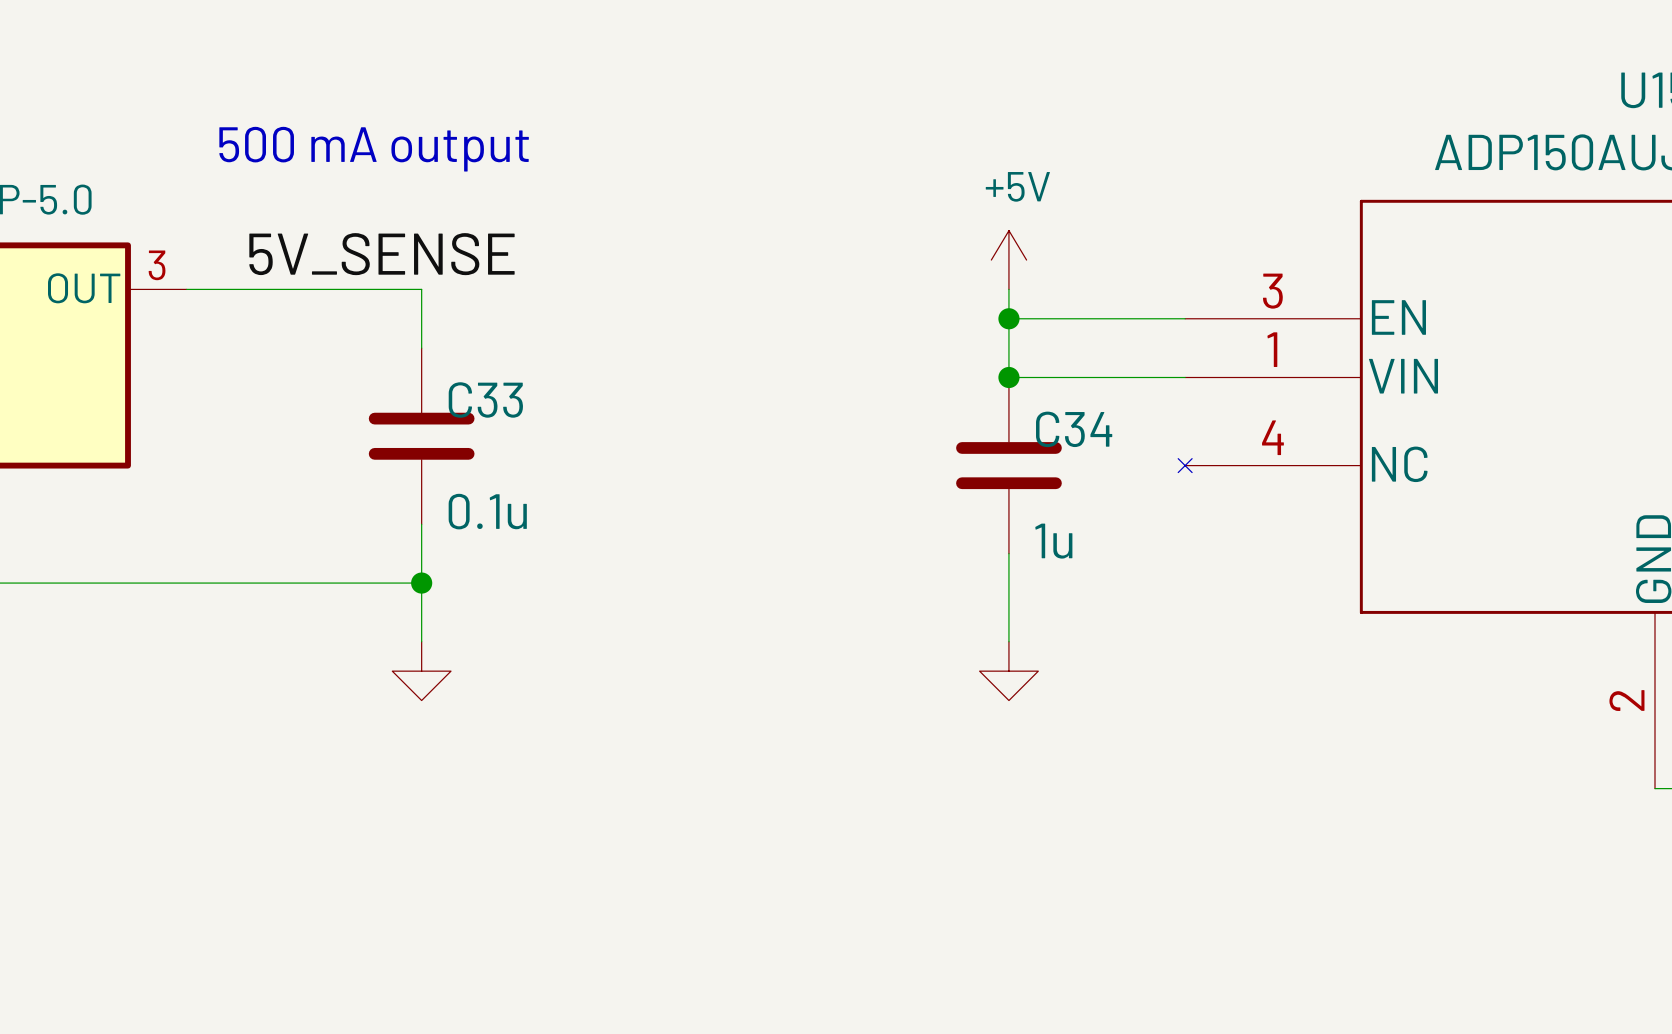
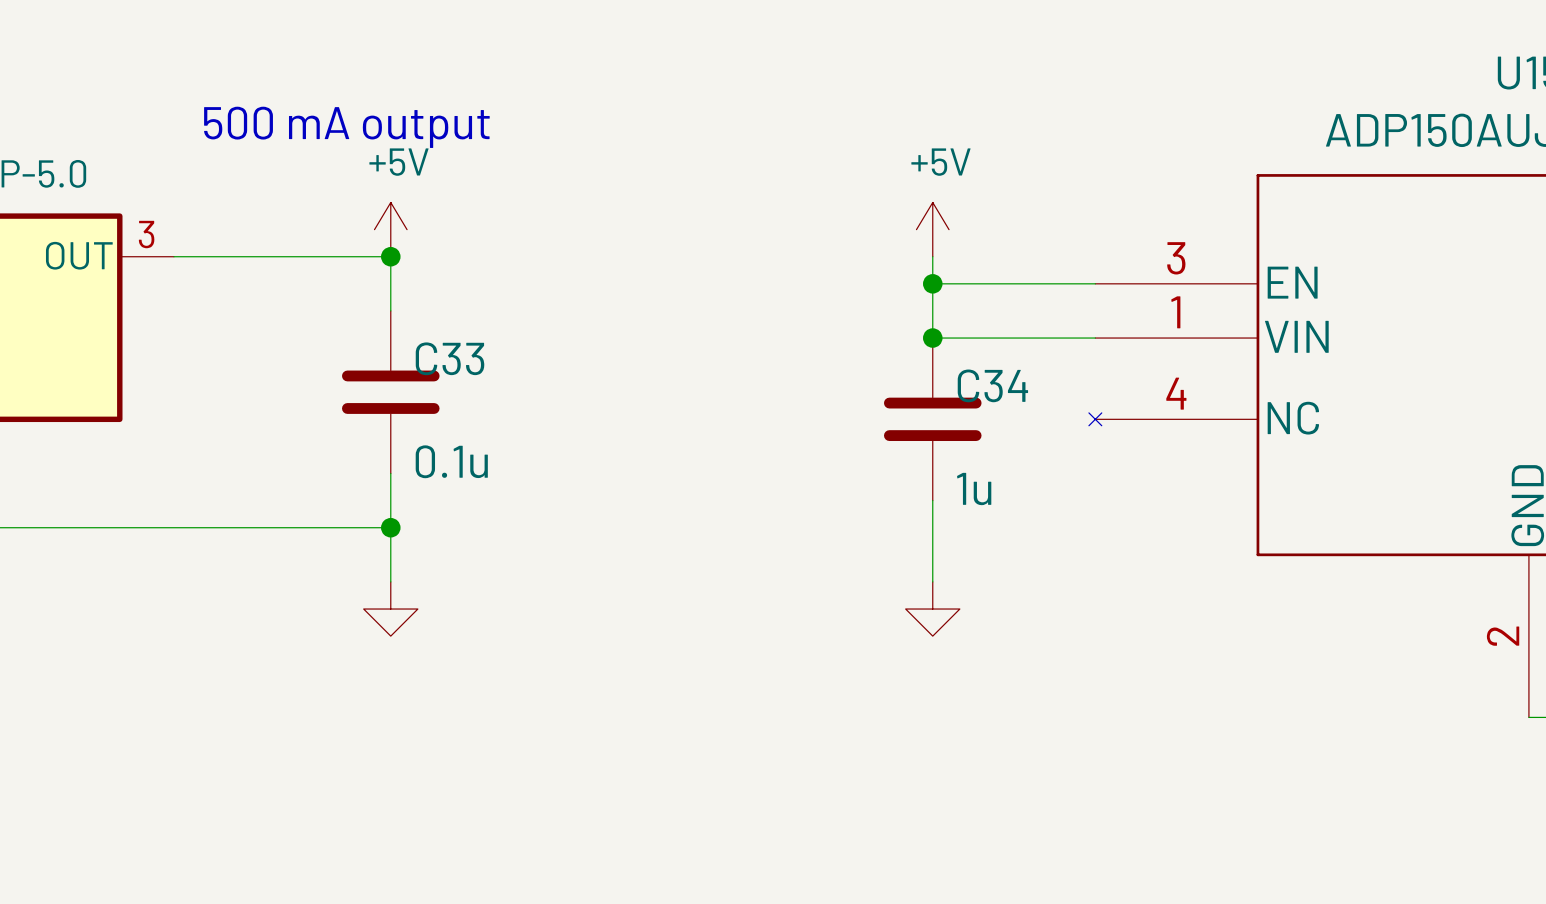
label: 5V_SENSE (381, 254) -> none
power symbol: none -> +5V (390, 229)
junction: none -> (390, 256)

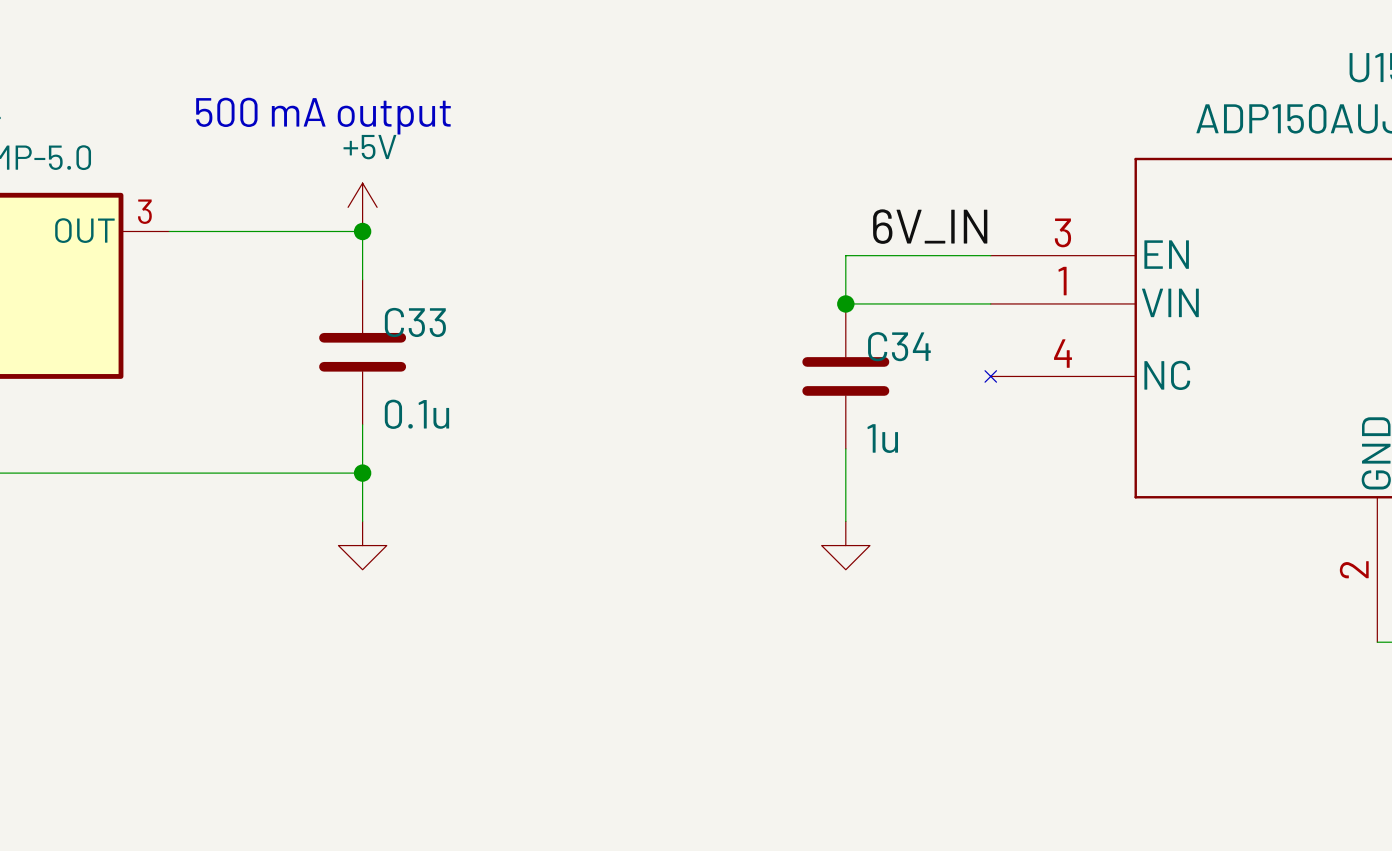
power symbol: +5V (932, 229) -> none
label: none -> 6V_IN (930, 226)
wire: (932, 256) (932, 283) -> none
junction: (932, 283) -> none

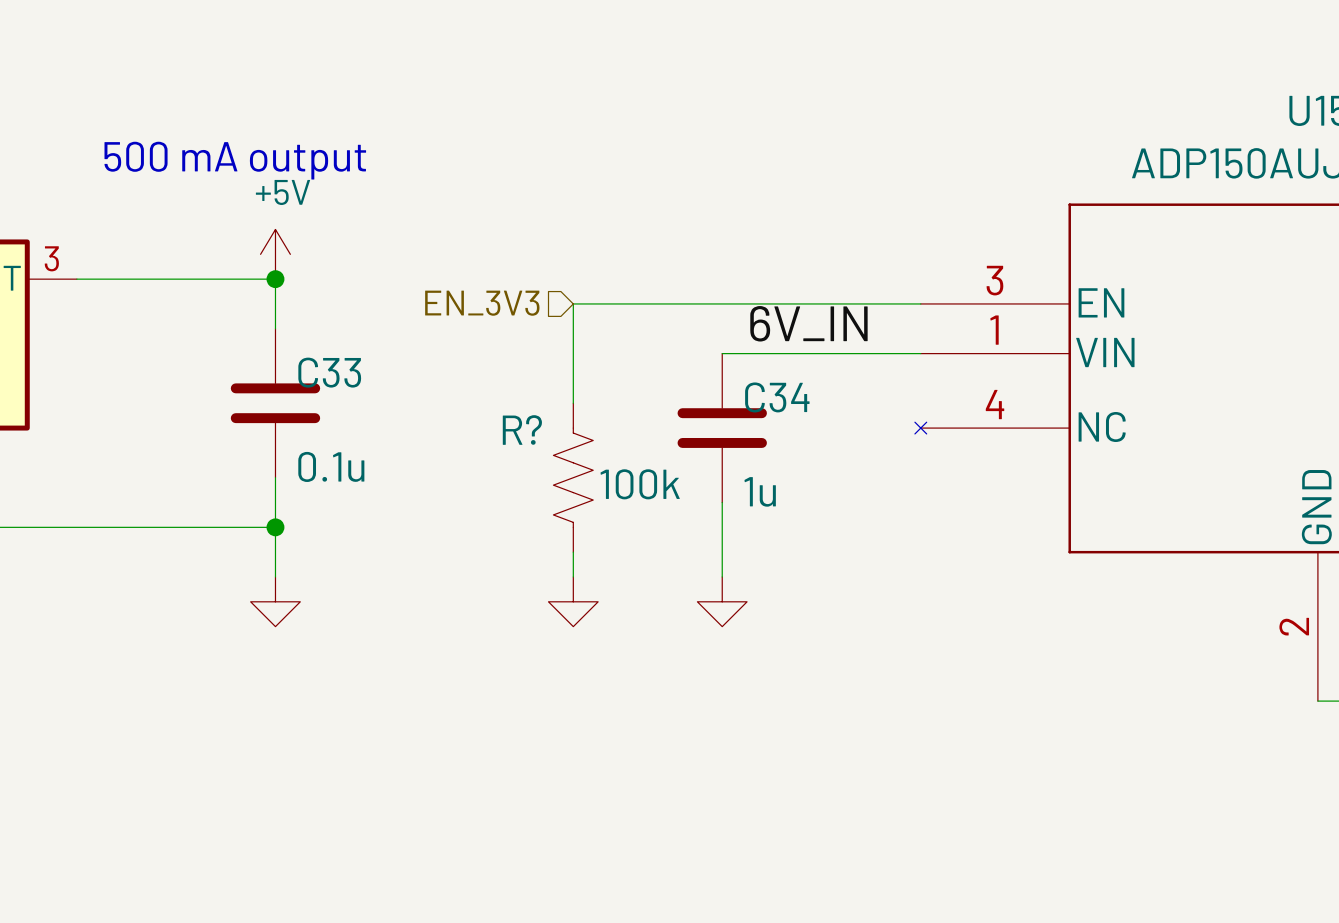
label position: 6V_IN (930, 226) -> 6V_IN (808, 323)
hierarchical label: none -> EN_3V3 (482, 303)
wire: (845, 255) (845, 303) -> (722, 353) (771, 353)
wire: none -> (771, 303) (573, 303) (573, 403)
junction: (845, 303) -> none
C34 position: (845, 376) -> (722, 428)
R?: none -> 100k (573, 477)
wire: (845, 448) (845, 521) -> (722, 502) (722, 576)
wire: none -> (573, 552) (573, 576)
power symbol: none -> (573, 601)
power symbol position: (845, 545) -> (722, 601)

